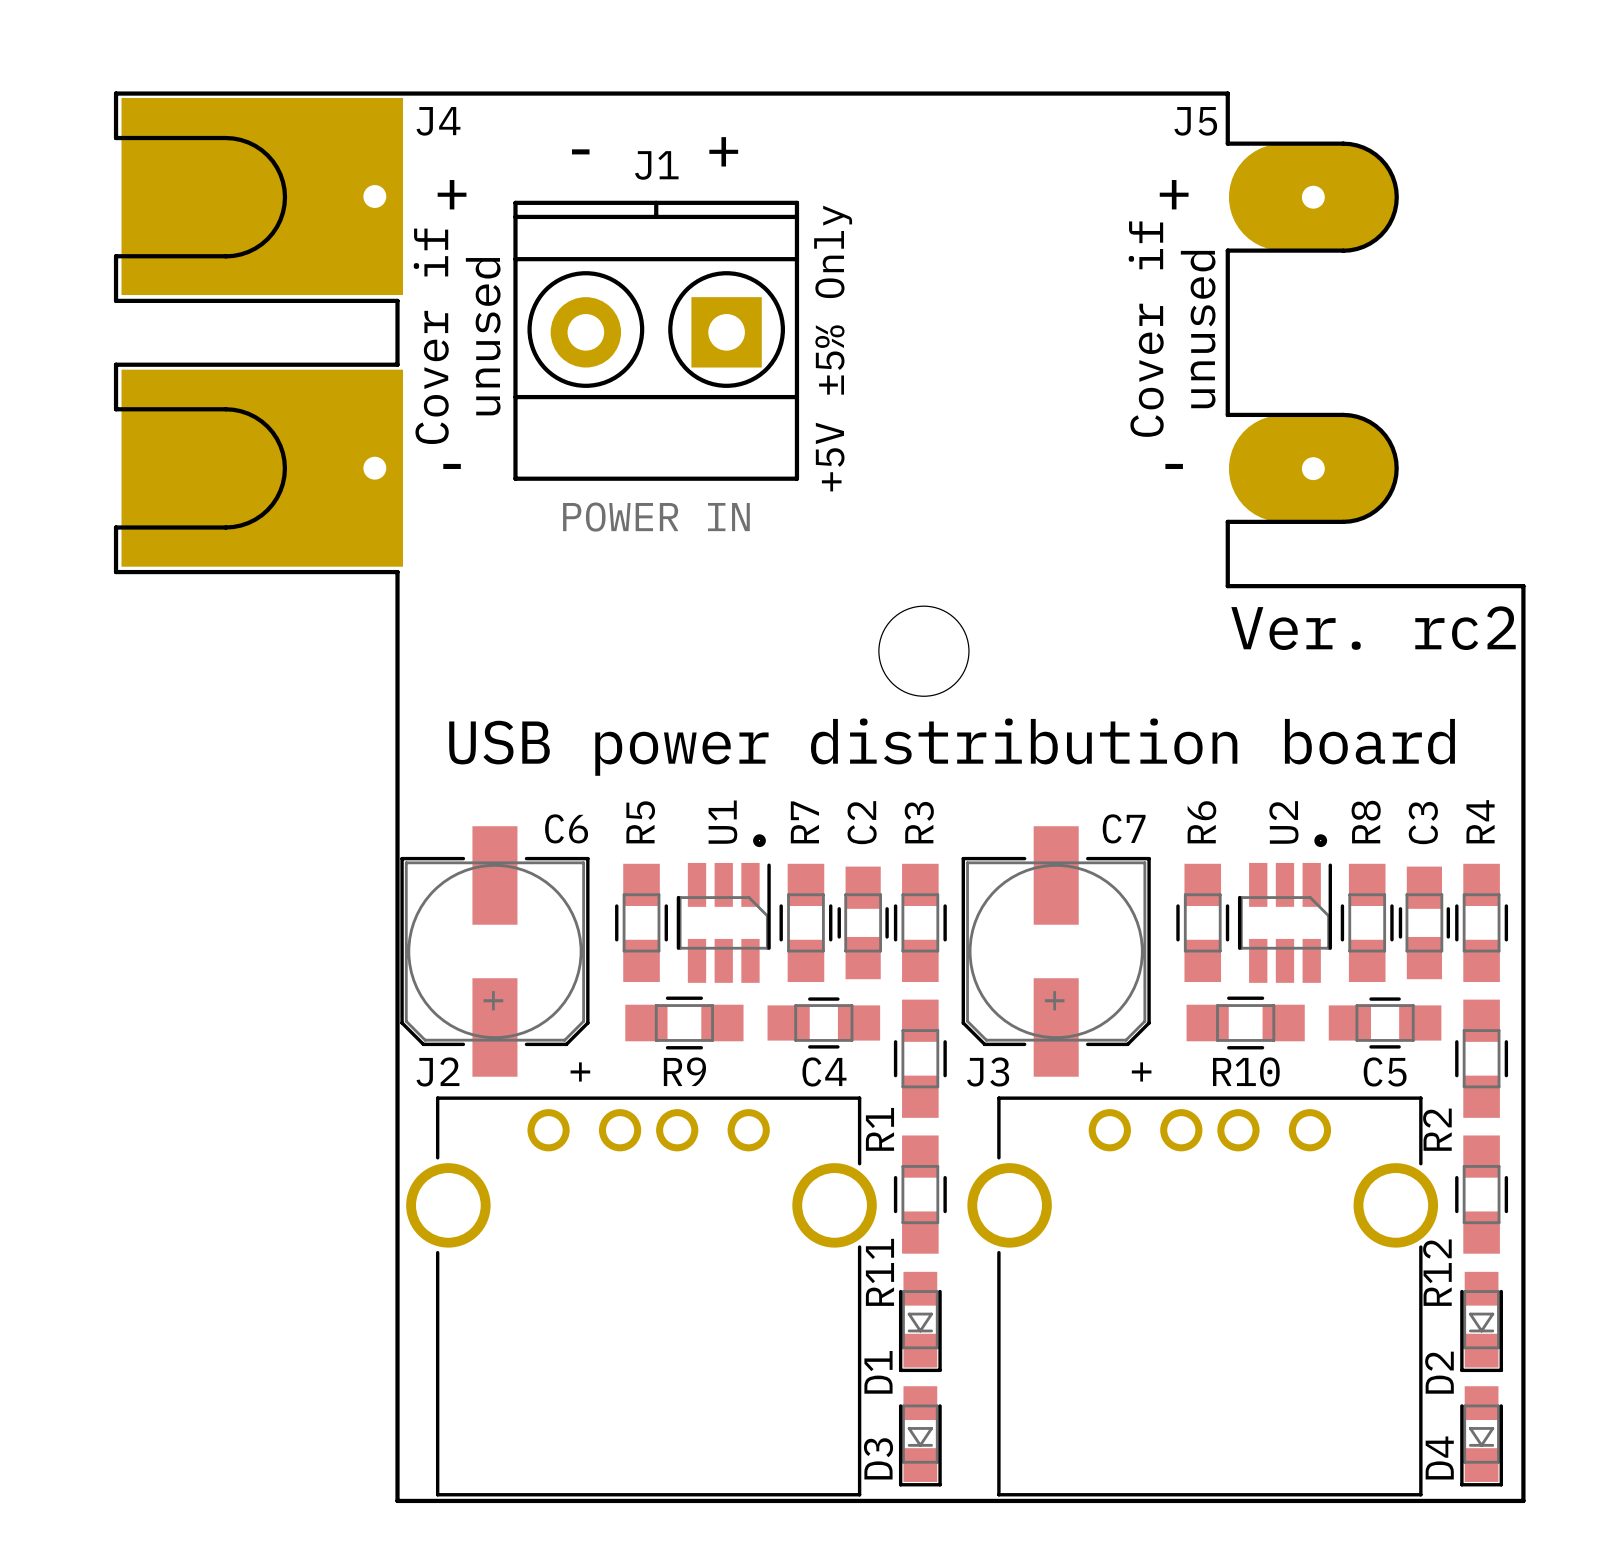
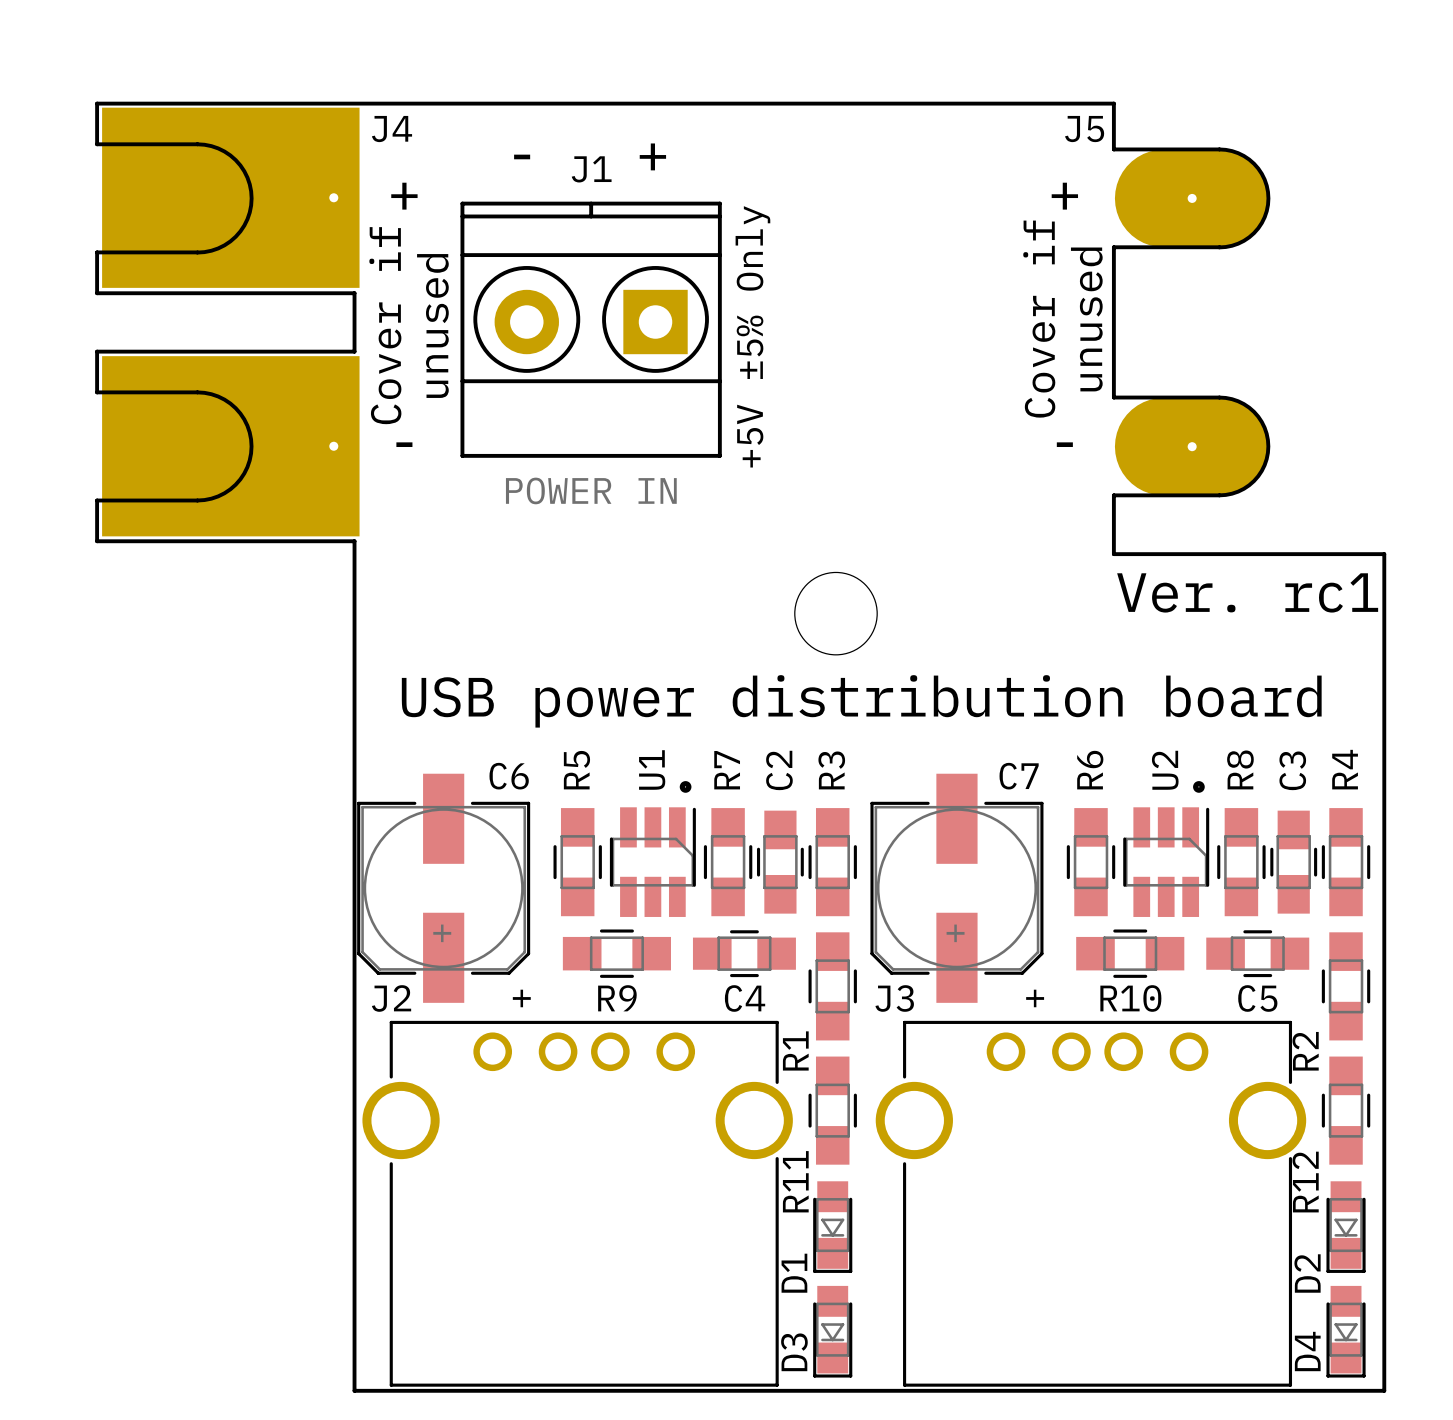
J4 footprint: [121, 97, 403, 567] -> [102, 107, 360, 537]
J5 footprint: [1228, 143, 1398, 523] -> [1114, 149, 1270, 496]
text: Ver. rc2 (1373, 628) -> Ver. rc1 (1247, 592)

